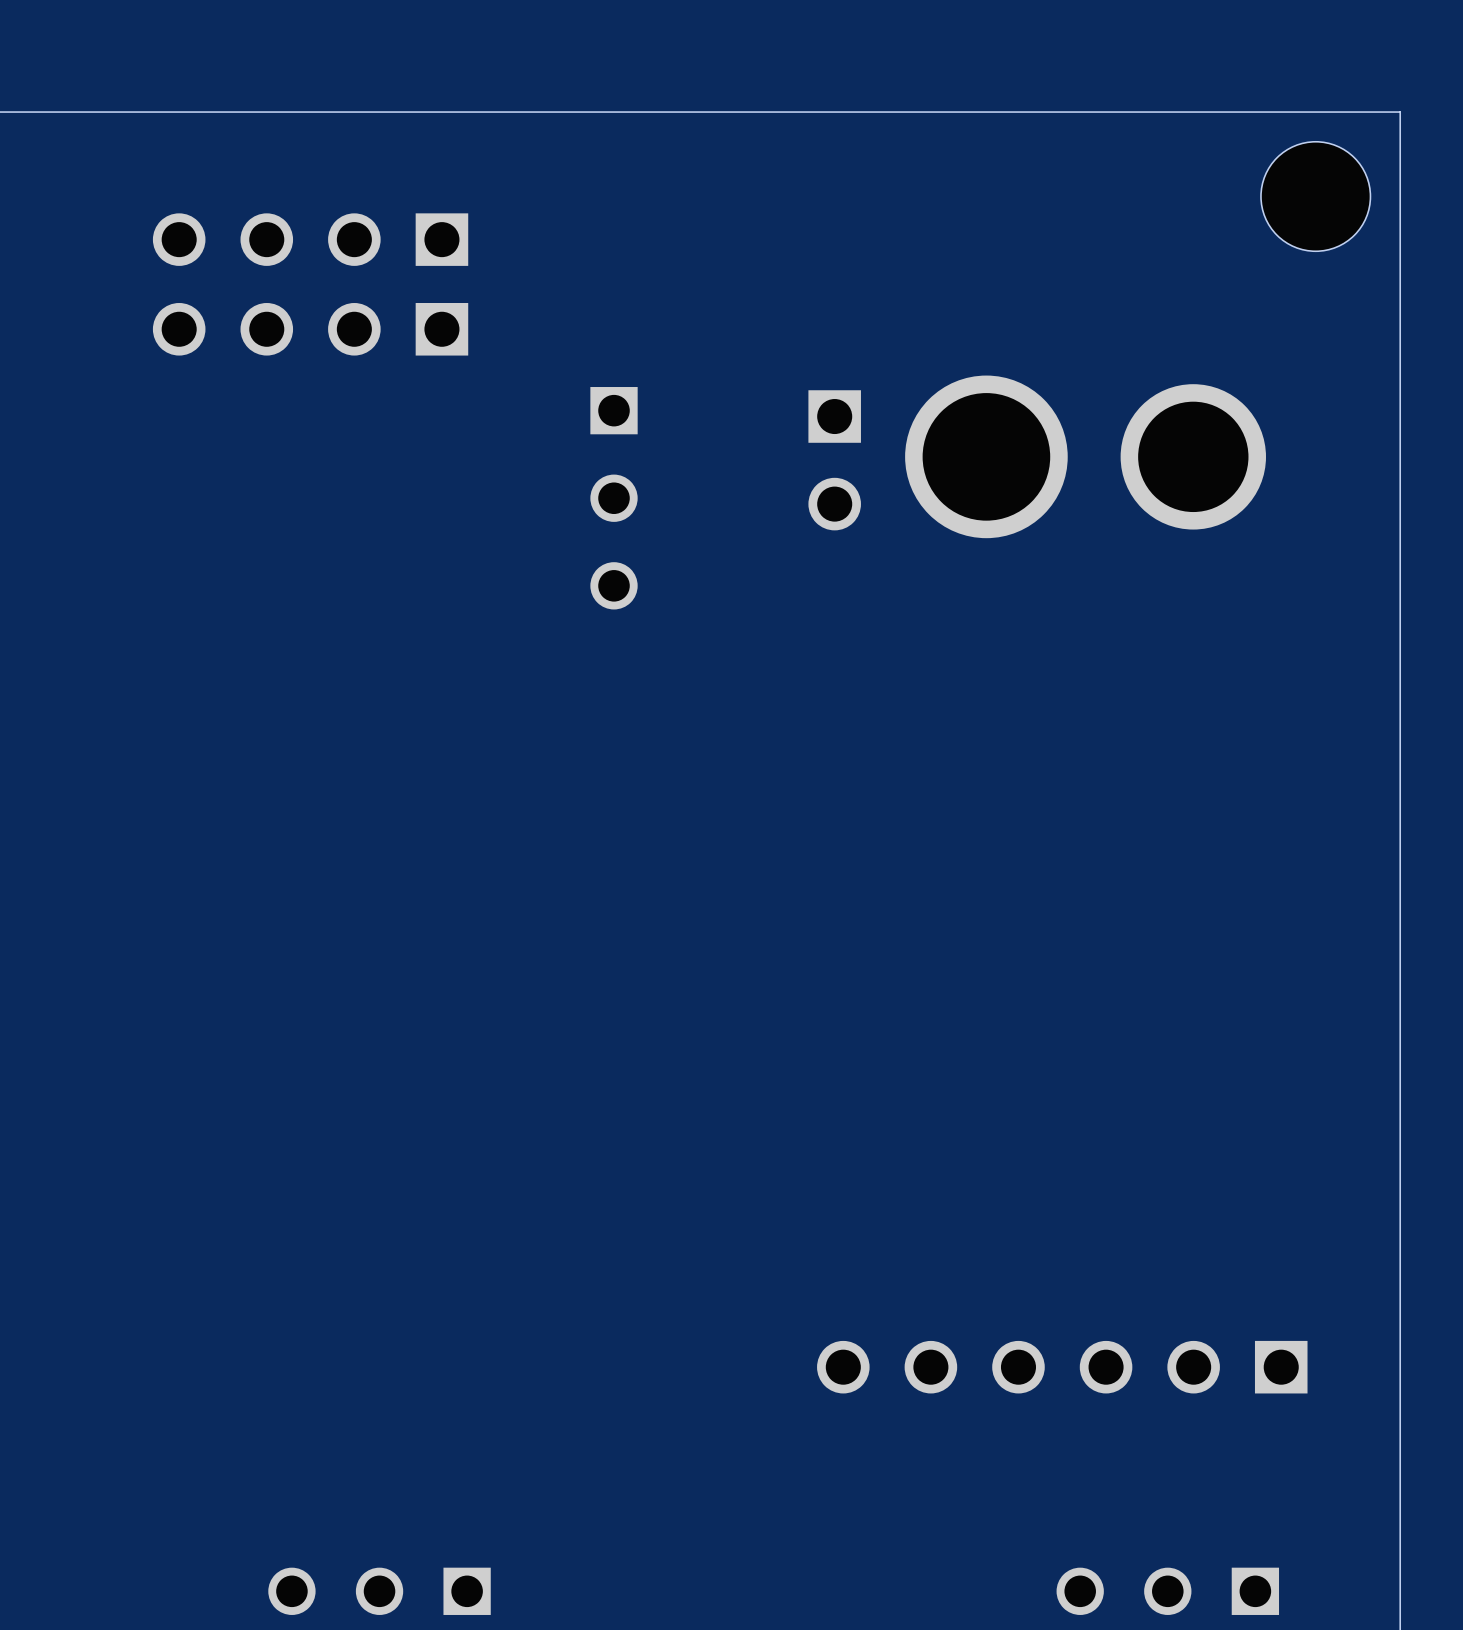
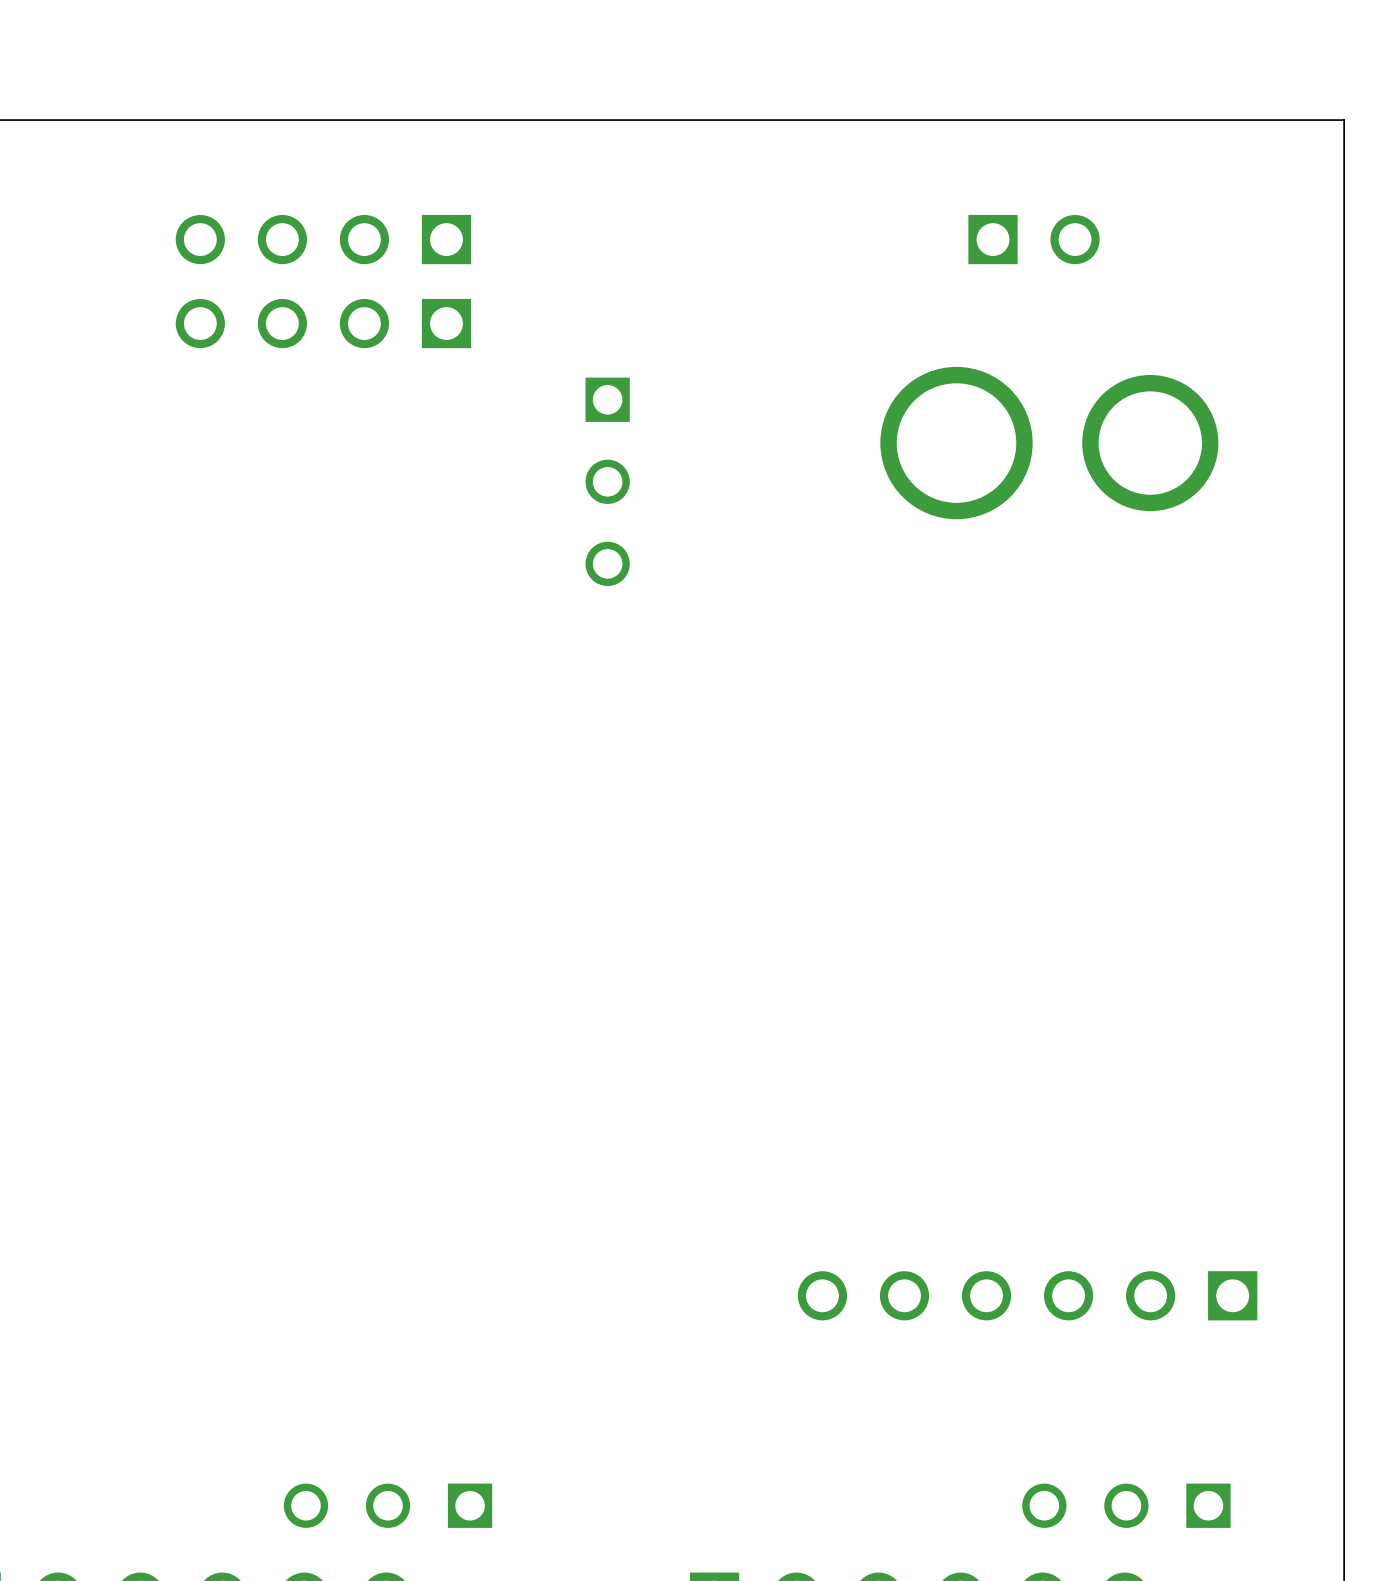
hole: (1315, 196) -> none
part rotation: 0° (834, 460) -> 90° counterclockwise (1034, 239)
part position: (834, 460) -> (1034, 239)

